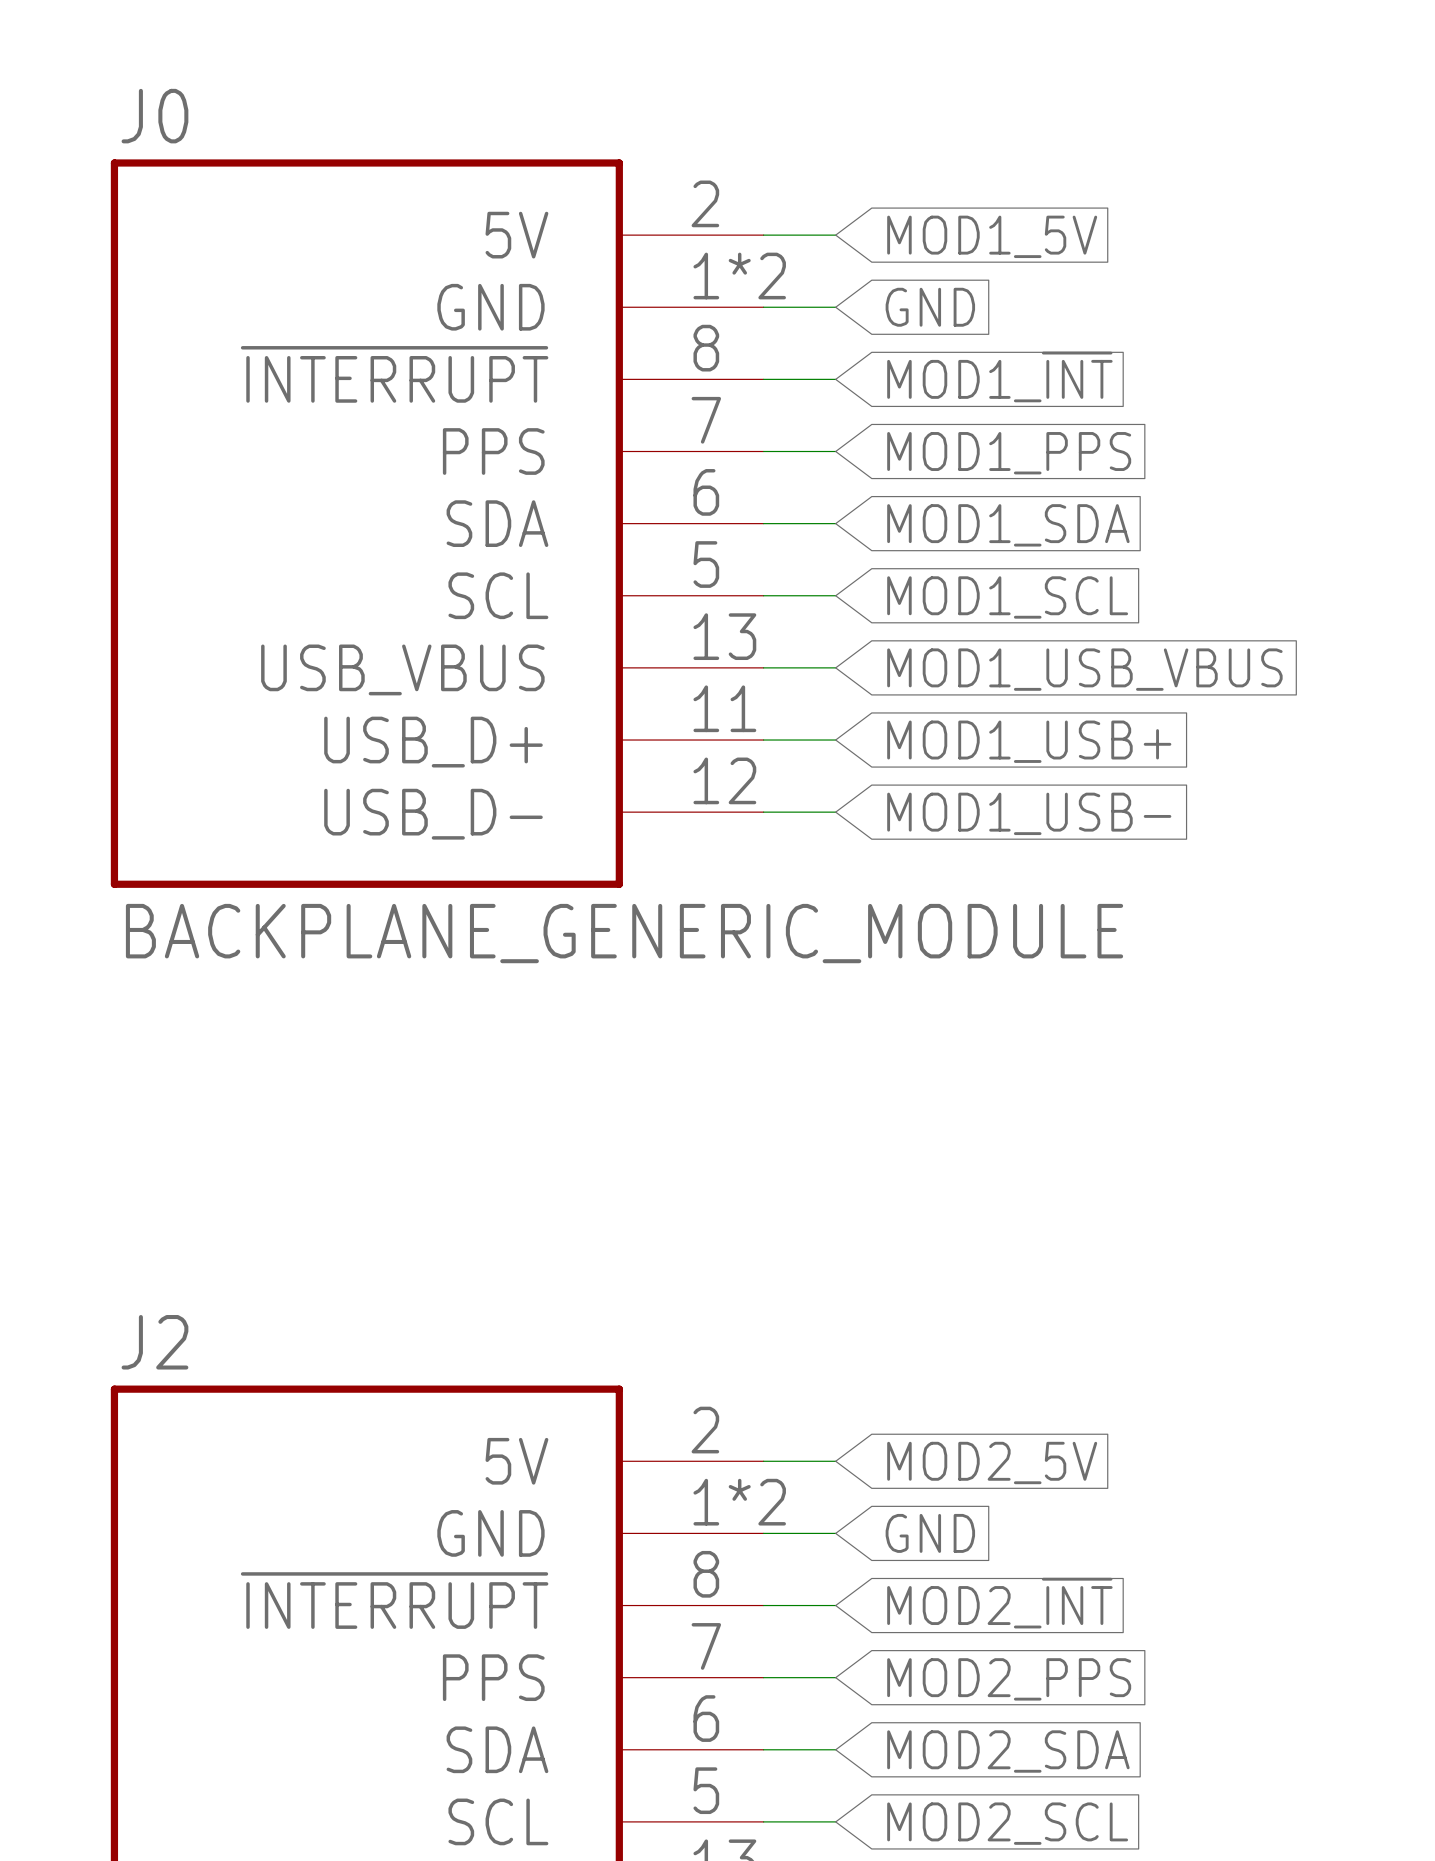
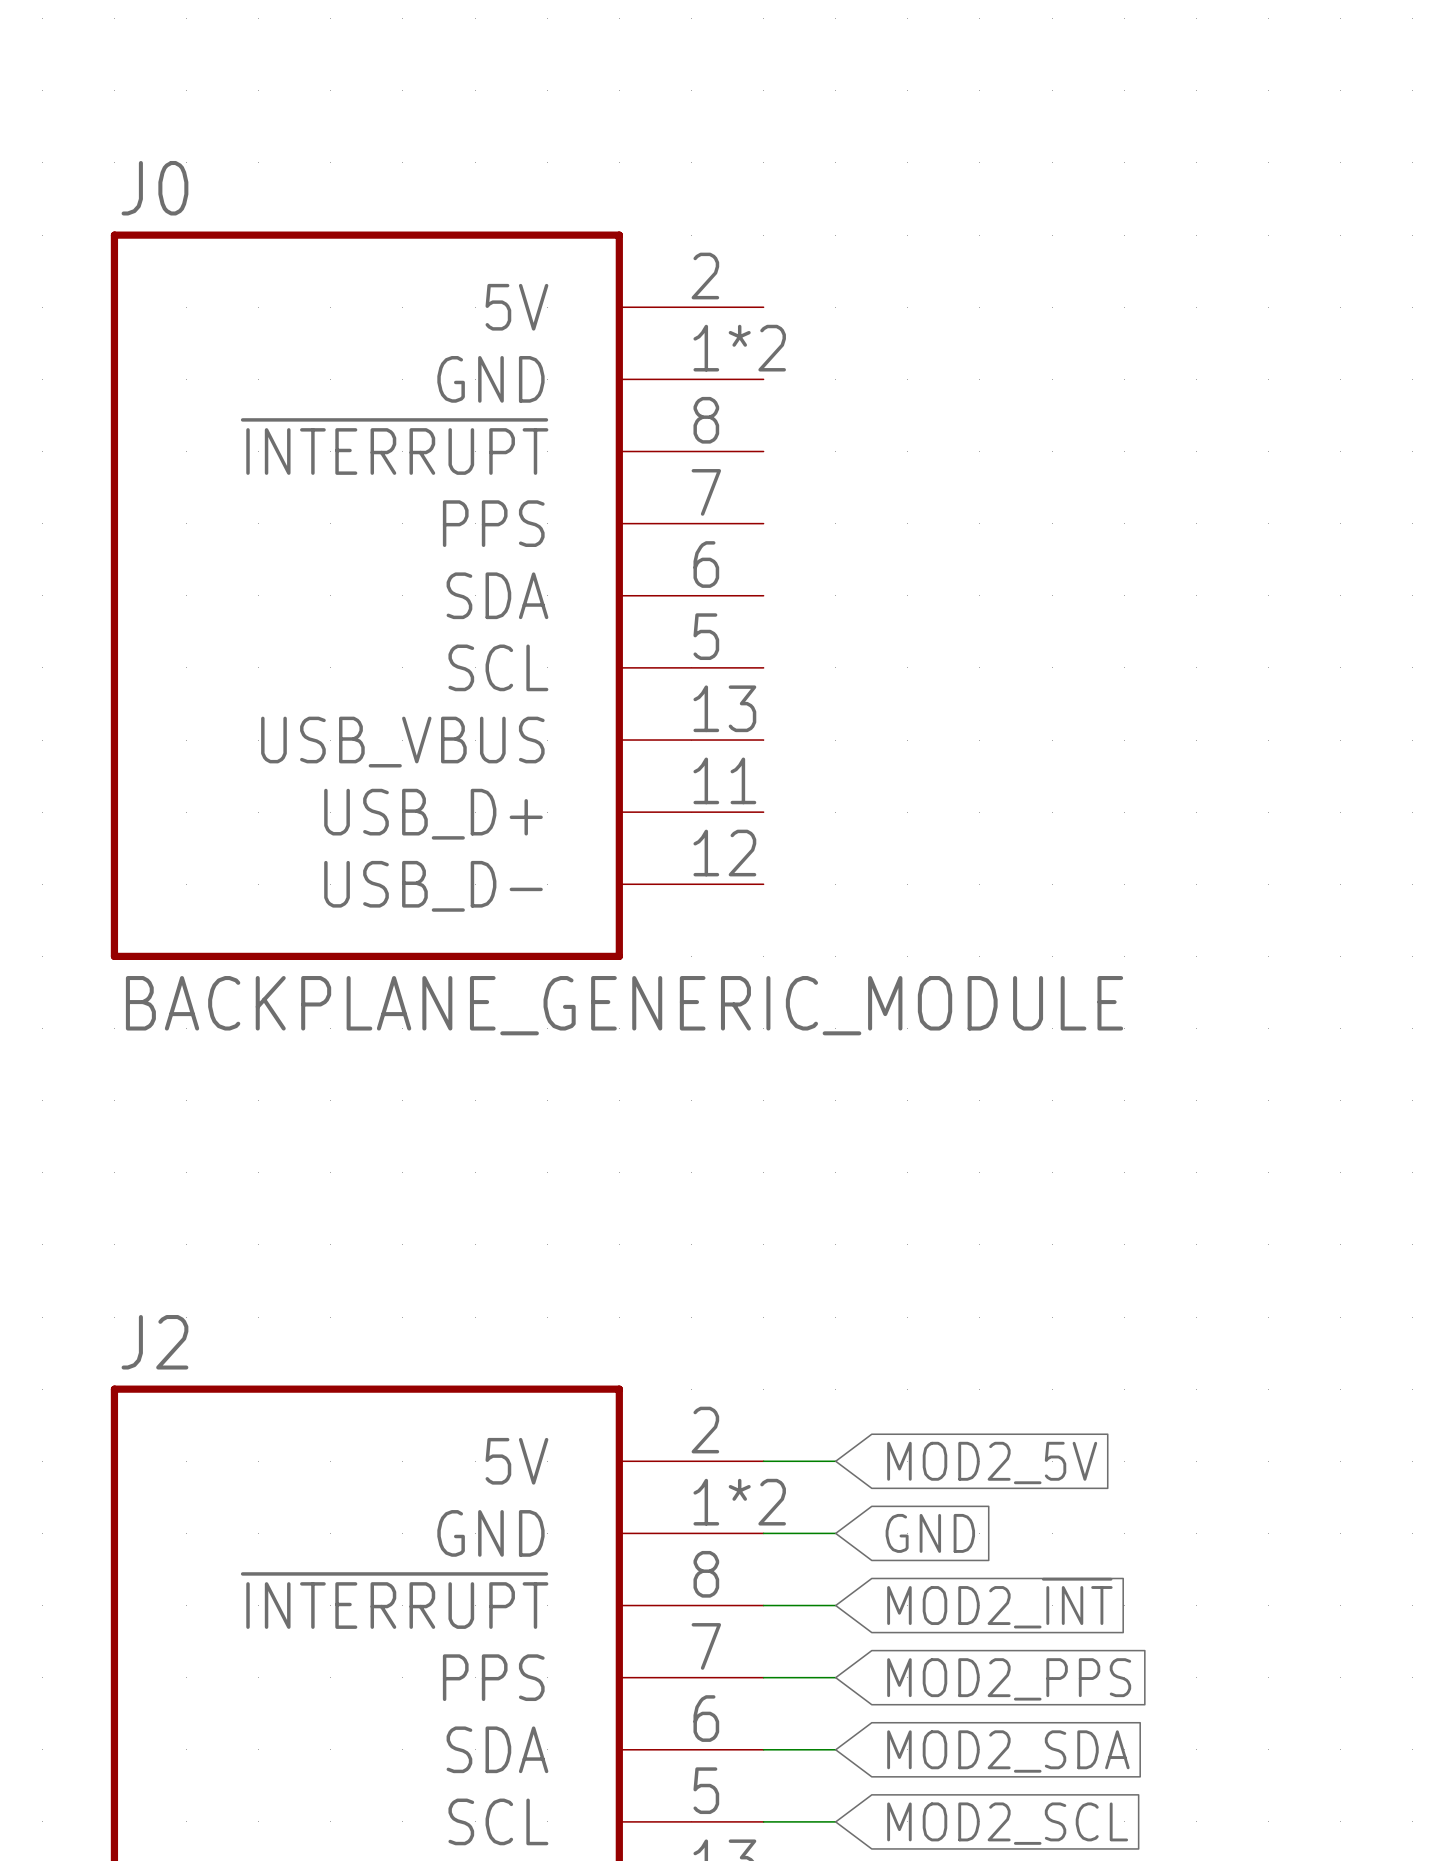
wire: (763, 235) (835, 235) -> none
global label: MOD1_5V (992, 236) -> none
wire: (763, 307) (835, 307) -> none
global label: GND (930, 307) -> none
global label: MOD1_~{INT} (999, 376) -> none
wire: (763, 379) (835, 379) -> none
wire: (763, 451) (835, 451) -> none
global label: MOD1_PPS (1009, 453) -> none
J0 position: (437, 523) -> (437, 595)
wire: (763, 523) (835, 523) -> none
global label: MOD1_SDA (1008, 525) -> none
wire: (763, 595) (835, 595) -> none
global label: MOD1_SCL (1007, 597) -> none
wire: (763, 667) (835, 667) -> none
global label: MOD1_USB_VBUS (1084, 669) -> none
wire: (763, 740) (835, 740) -> none
global label: MOD1_USB+ (1029, 741) -> none
wire: (763, 812) (835, 812) -> none
global label: MOD1_USB- (1029, 813) -> none

